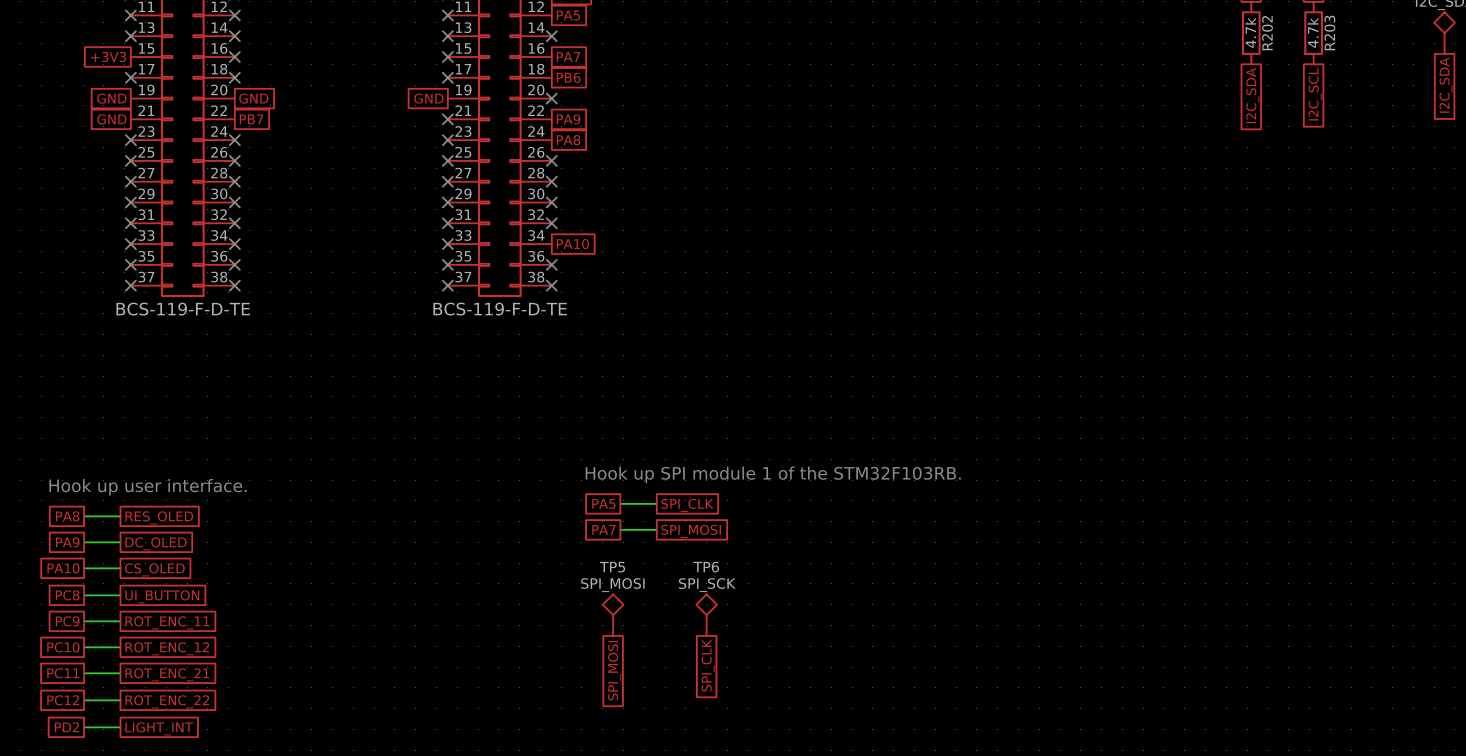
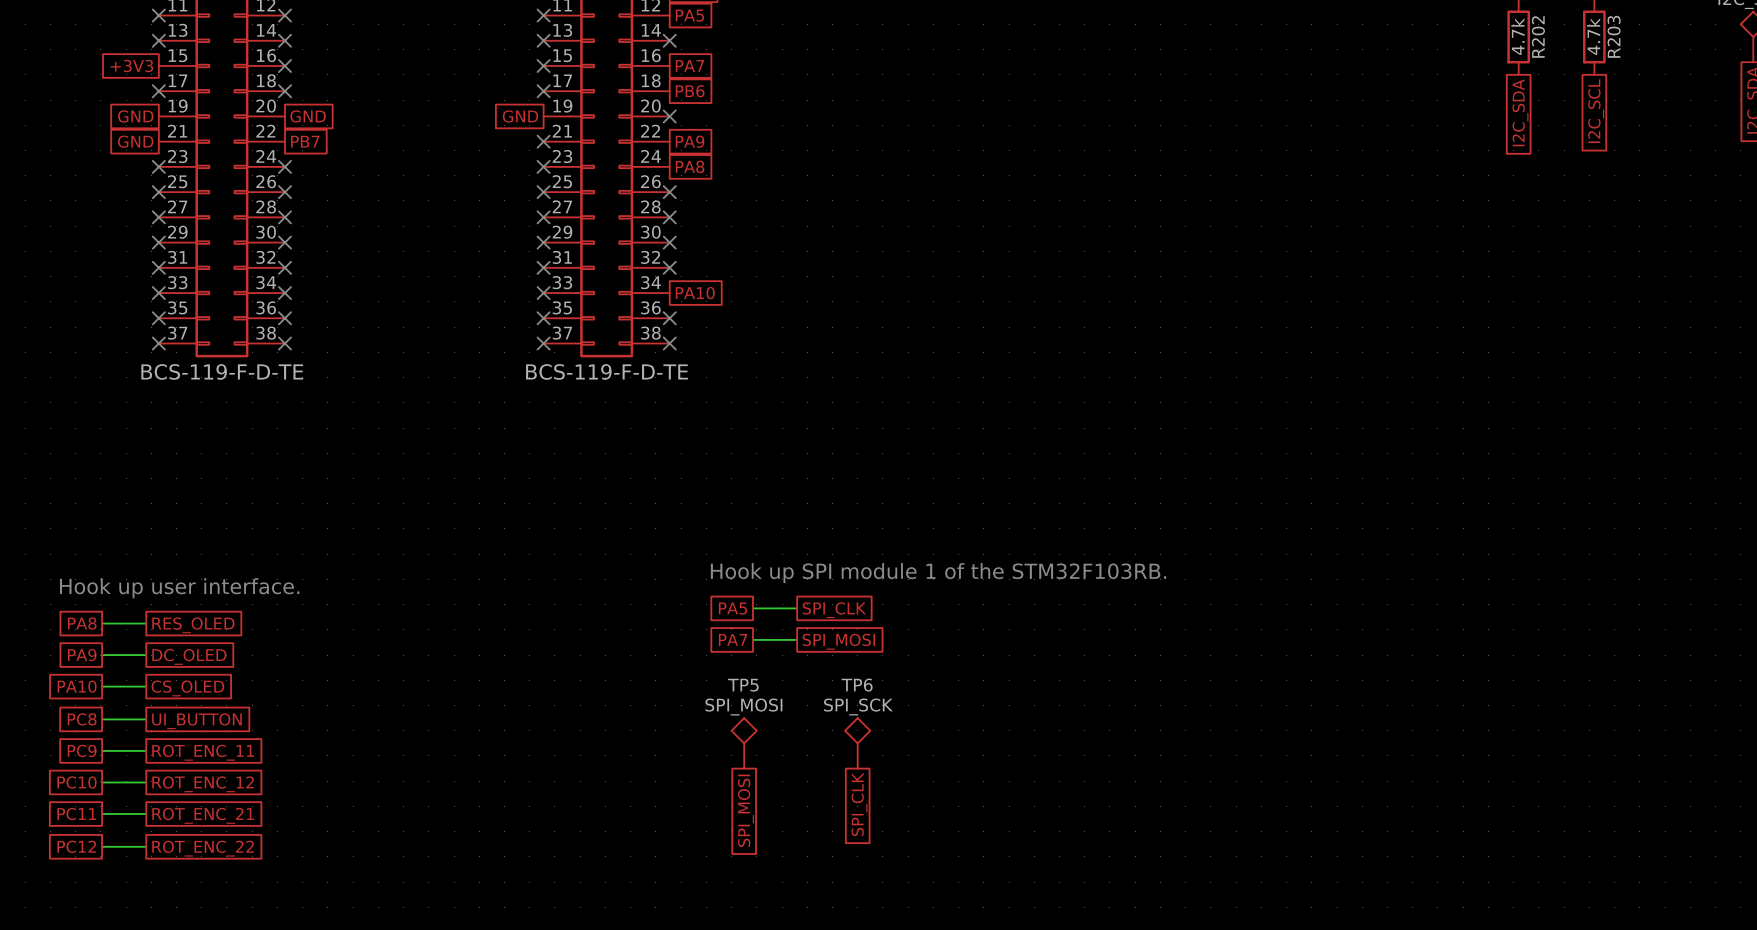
global label: PD2 (66, 727) -> none
wire: (84, 727) (120, 727) -> none
global label: LIGHT_INT (159, 728) -> none

